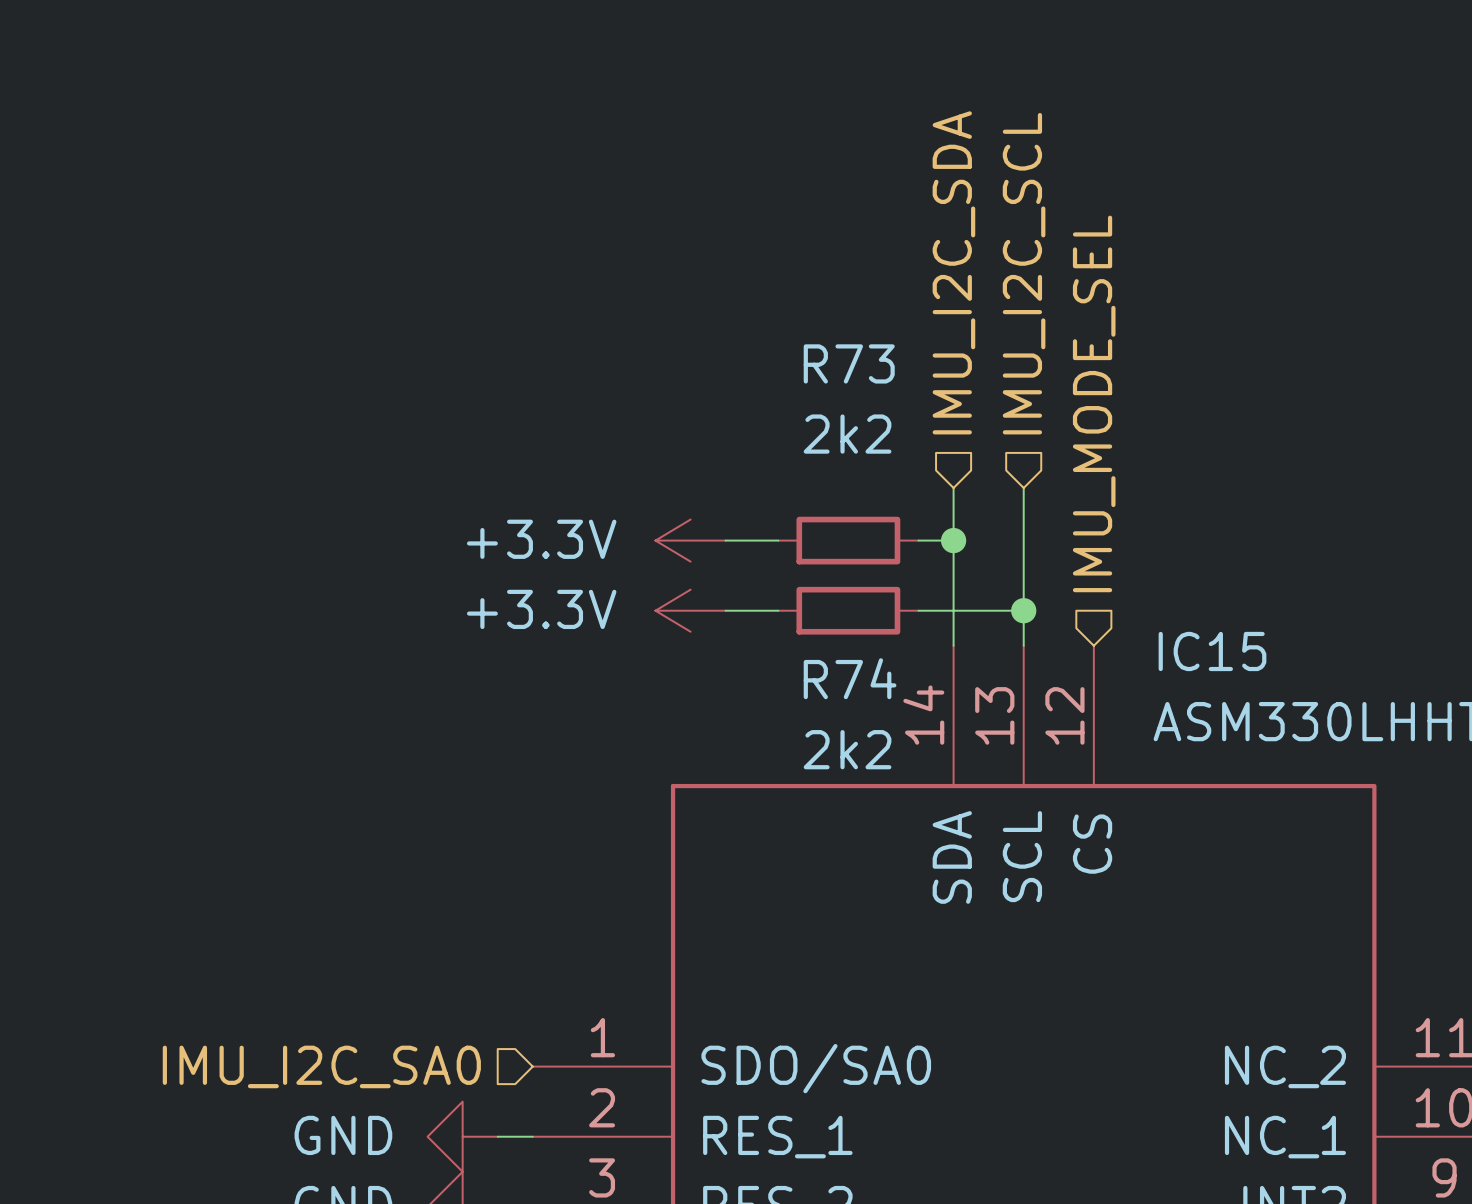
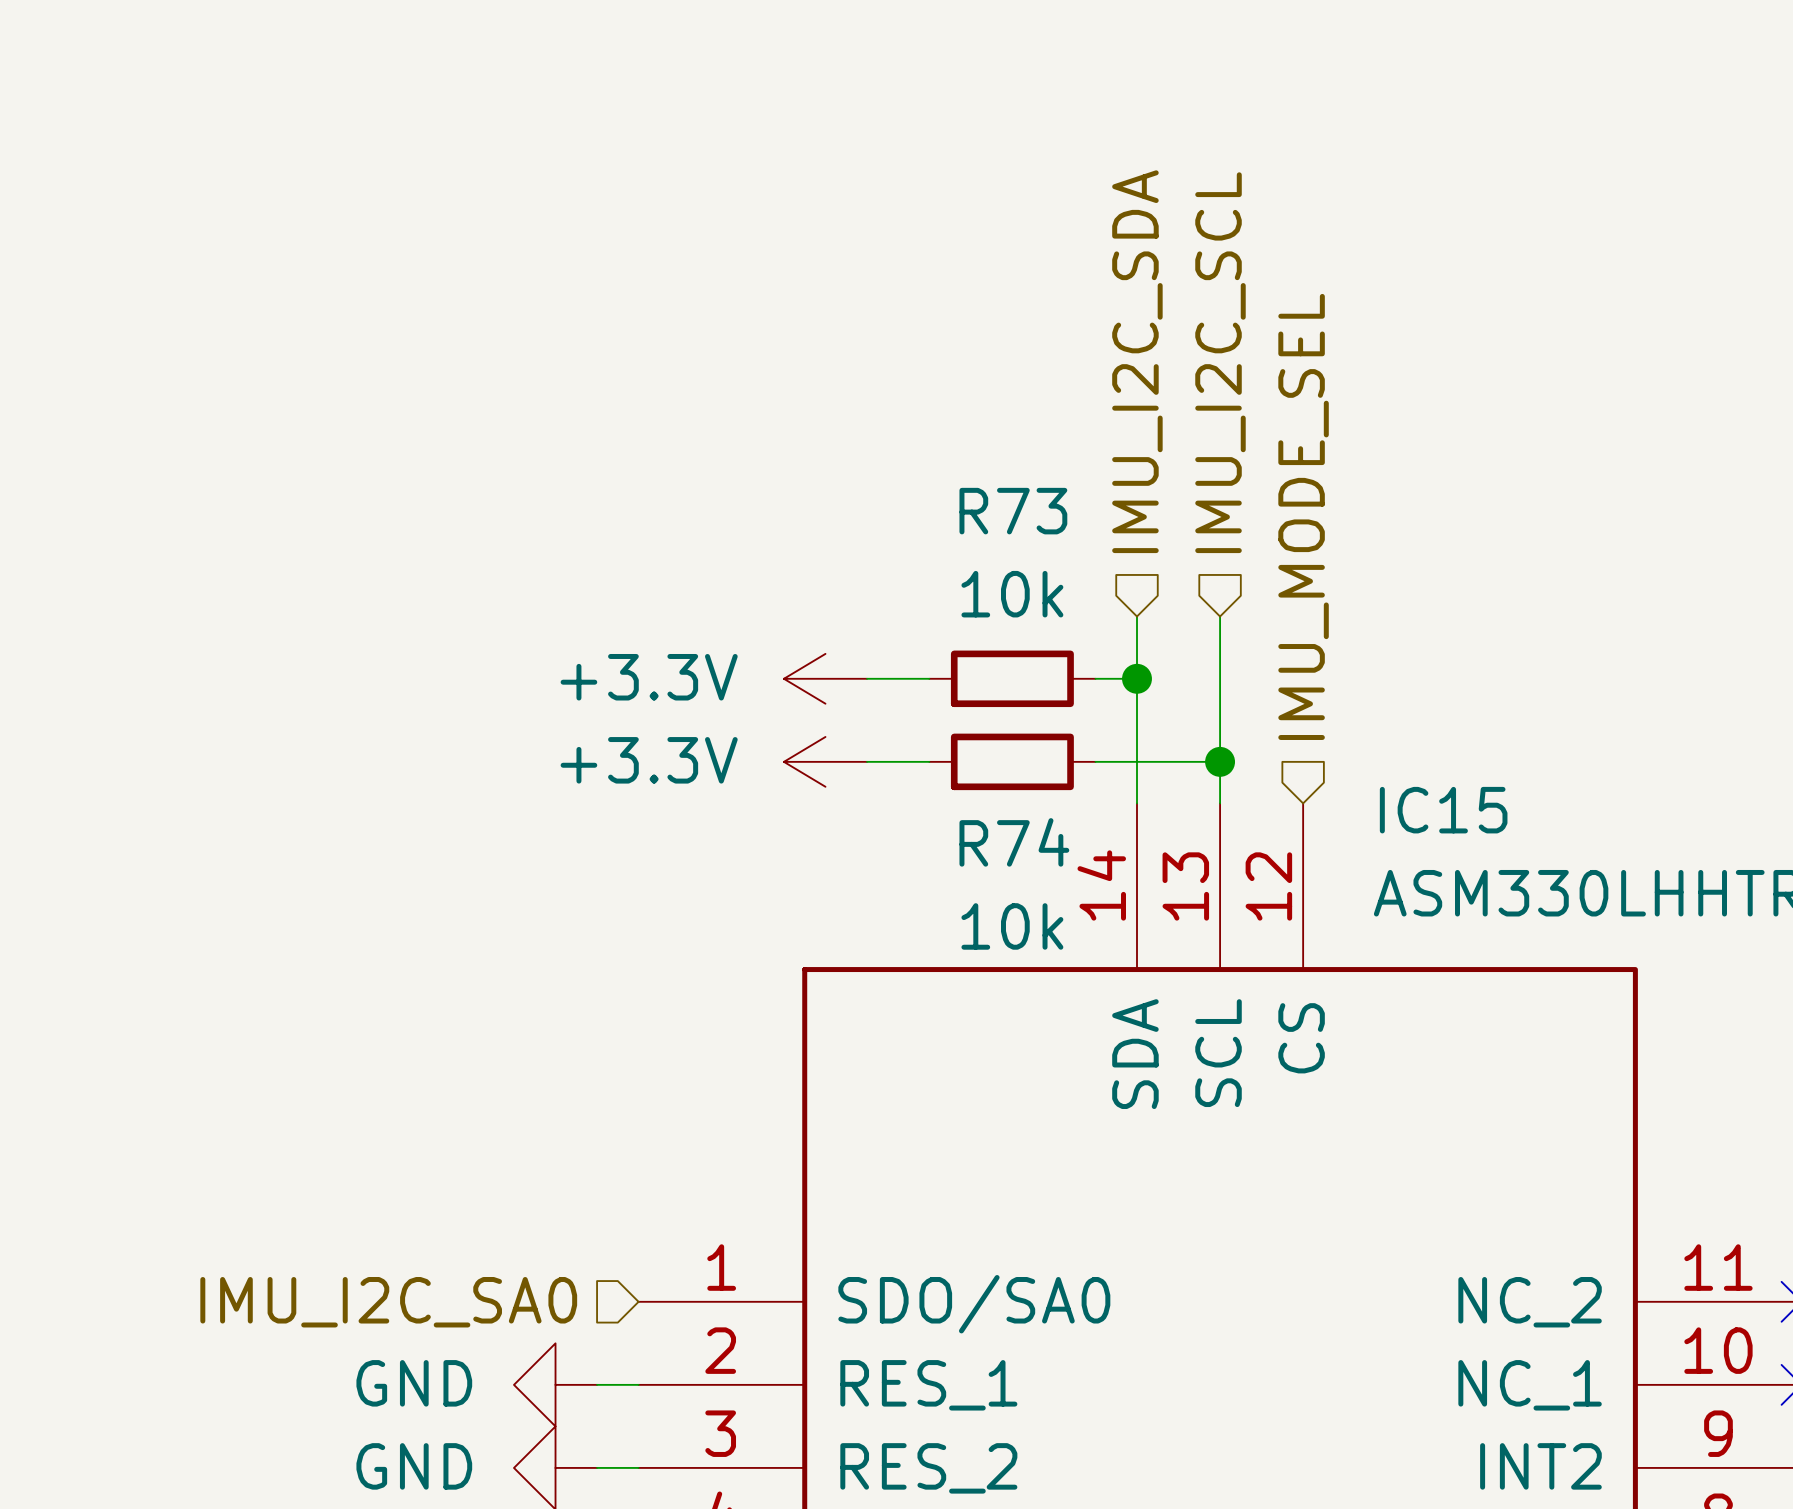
R73 name position: R73 (849, 363) -> R73 (1013, 511)
R73 value: 2k2 (847, 434) -> 10k (1012, 594)
R74 value: 2k2 (847, 749) -> 10k (1012, 926)

